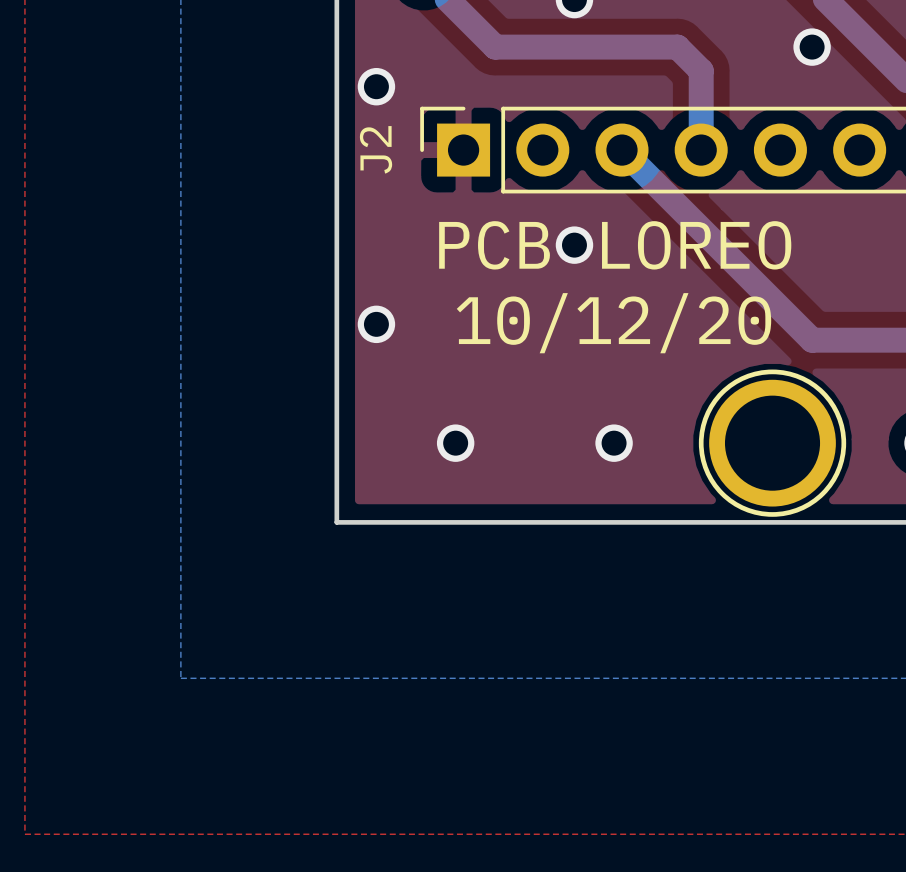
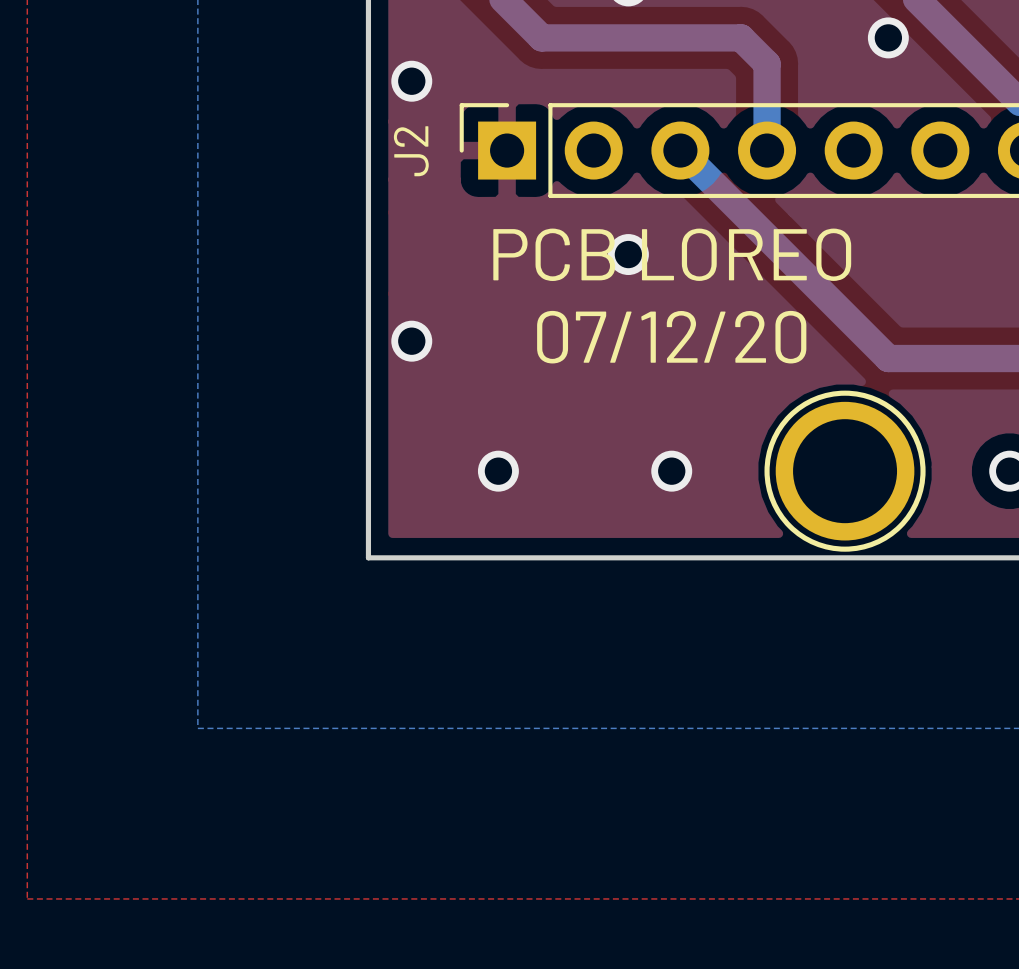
text: 10/12/20 (613, 323) -> 07/12/20 (671, 337)

